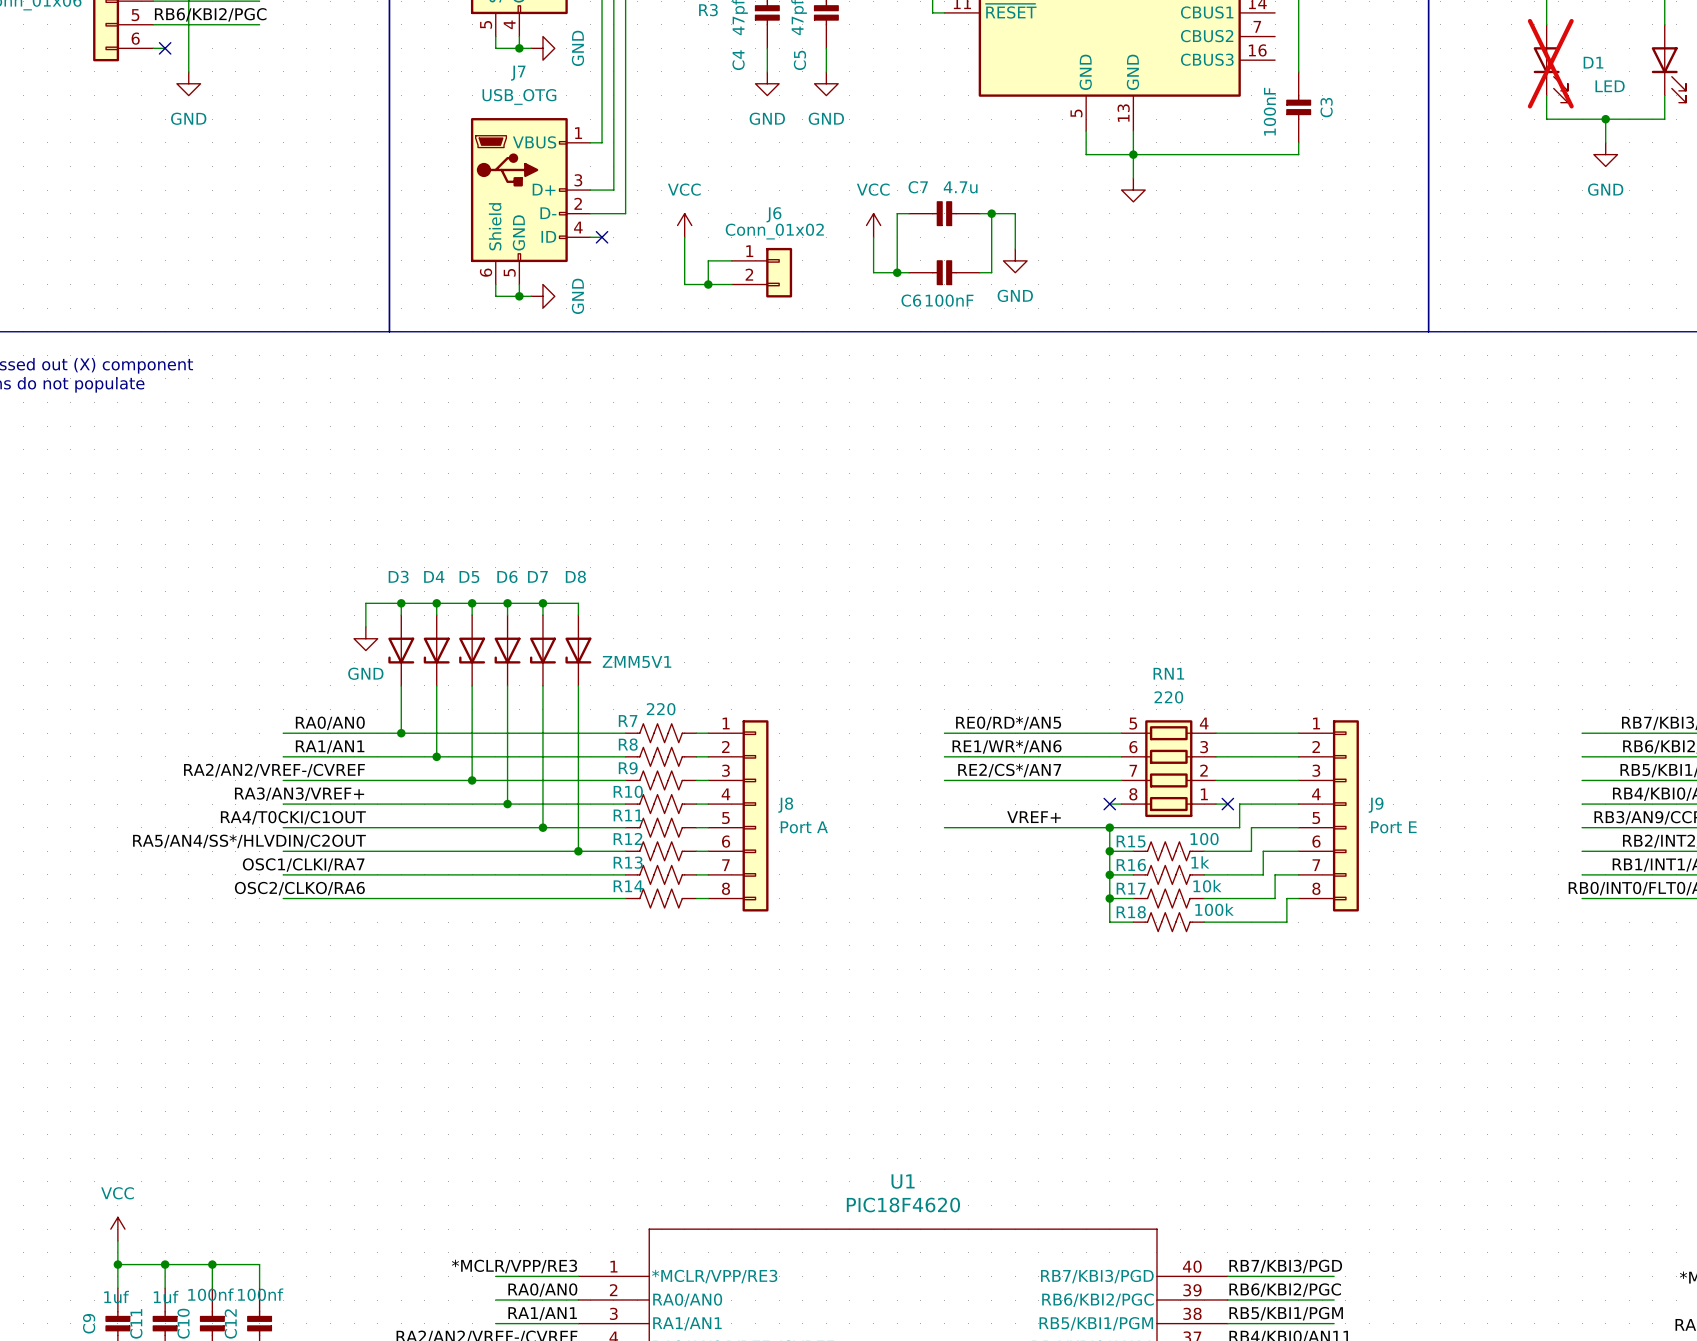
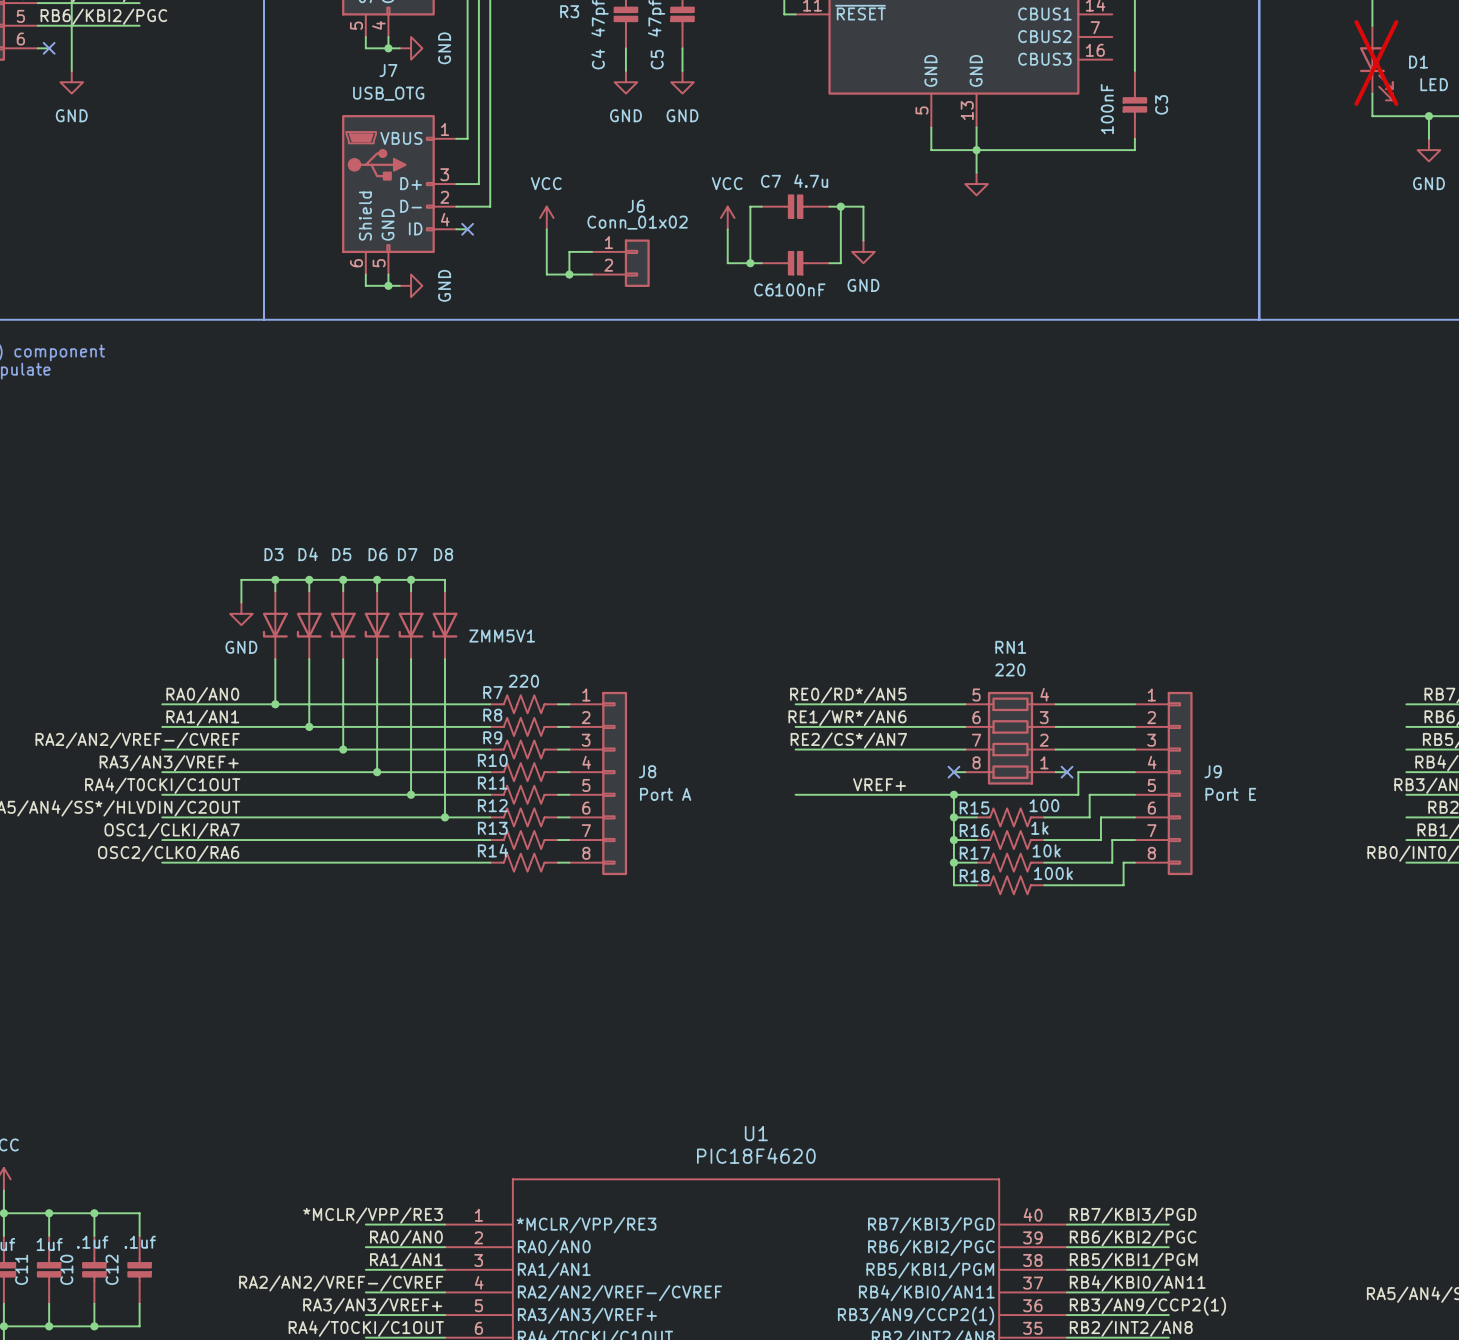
C10 value: 100nf (211, 1294) -> .1uf (92, 1242)
C12 value: 100nf (260, 1294) -> .1uf (140, 1242)

